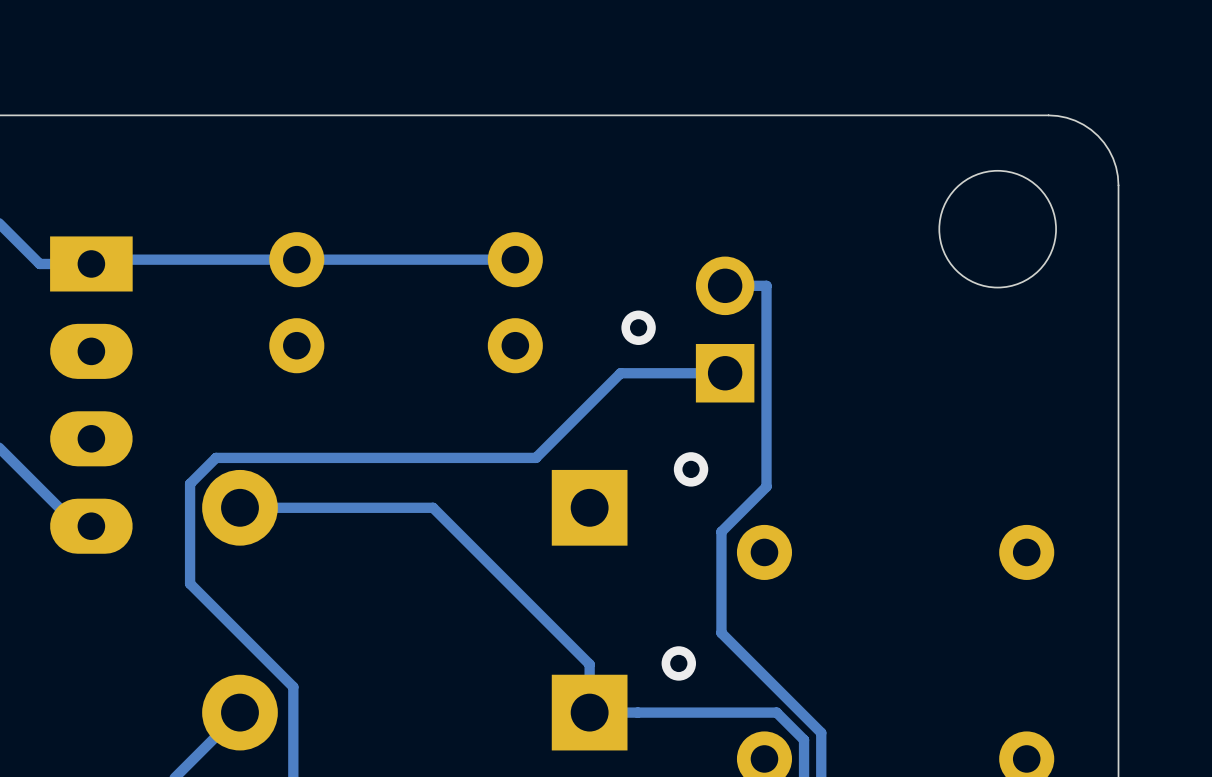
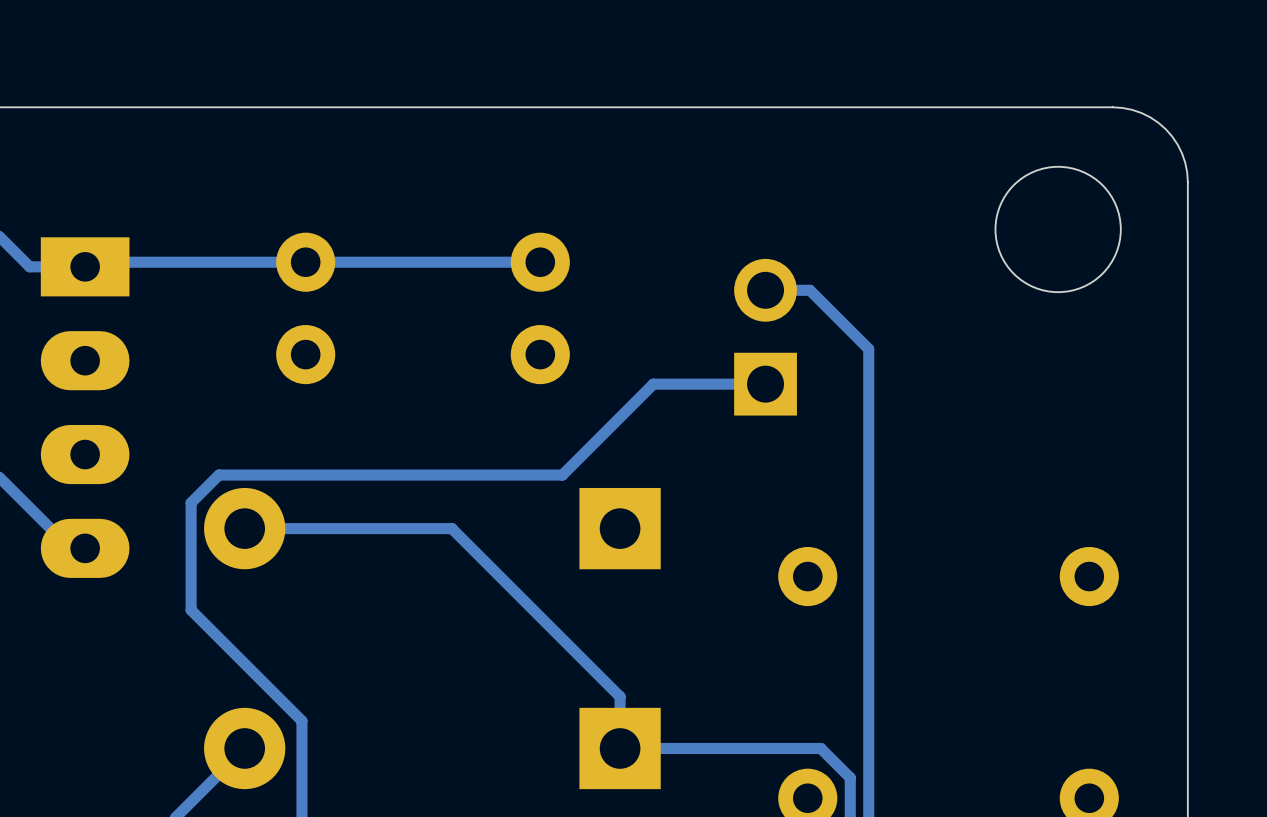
track: (766, 285) (766, 486) (721, 531) (721, 633) (821, 732) -> (809, 290) (868, 349) (868, 770)
via: (638, 327) -> none
via: (691, 469) -> none
via: (678, 663) -> none

